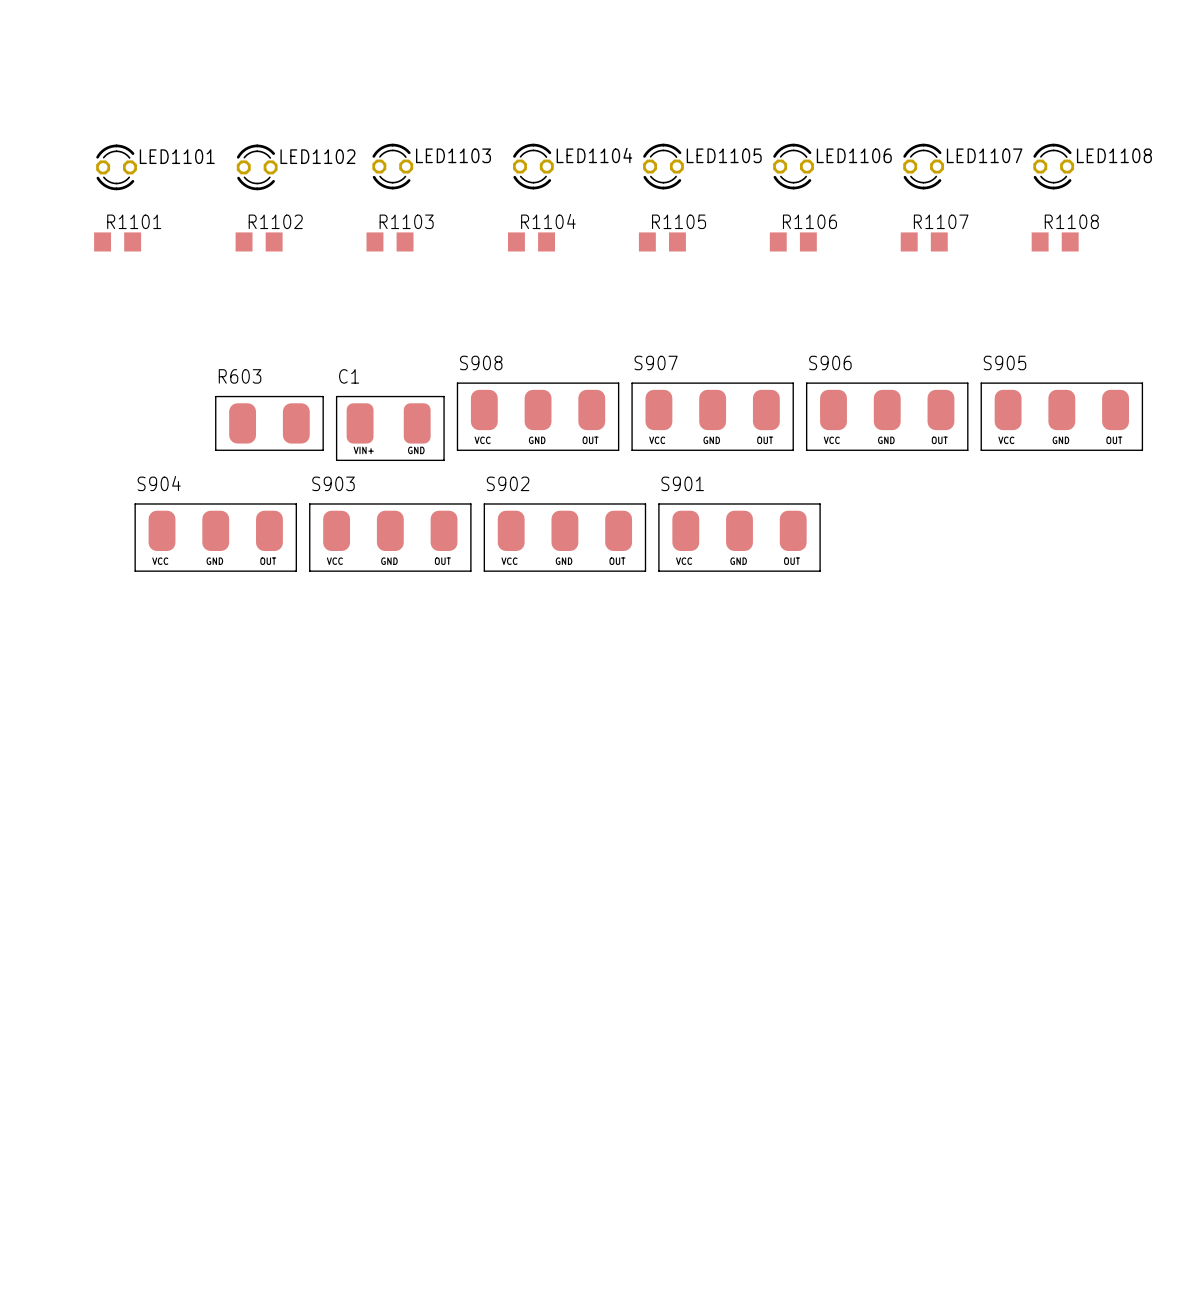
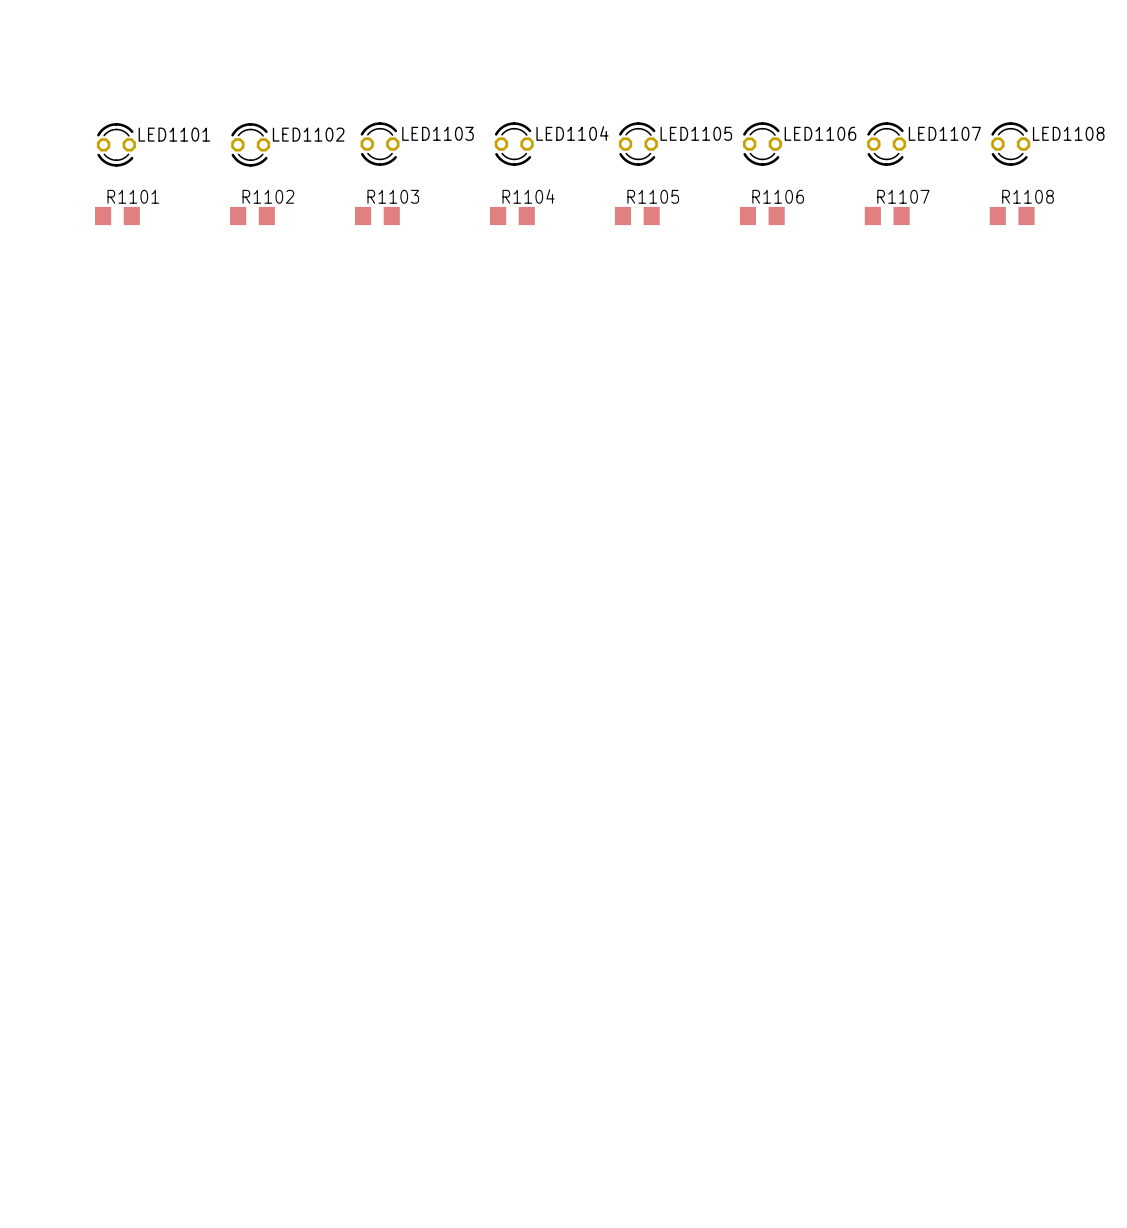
S908: (538, 416) -> none
S907: (712, 416) -> none
S906: (887, 416) -> none
S905: (1061, 416) -> none
R603: (269, 423) -> none
C1: (390, 428) -> none
S904: (215, 537) -> none
S903: (390, 537) -> none
S902: (564, 537) -> none
S901: (739, 537) -> none

